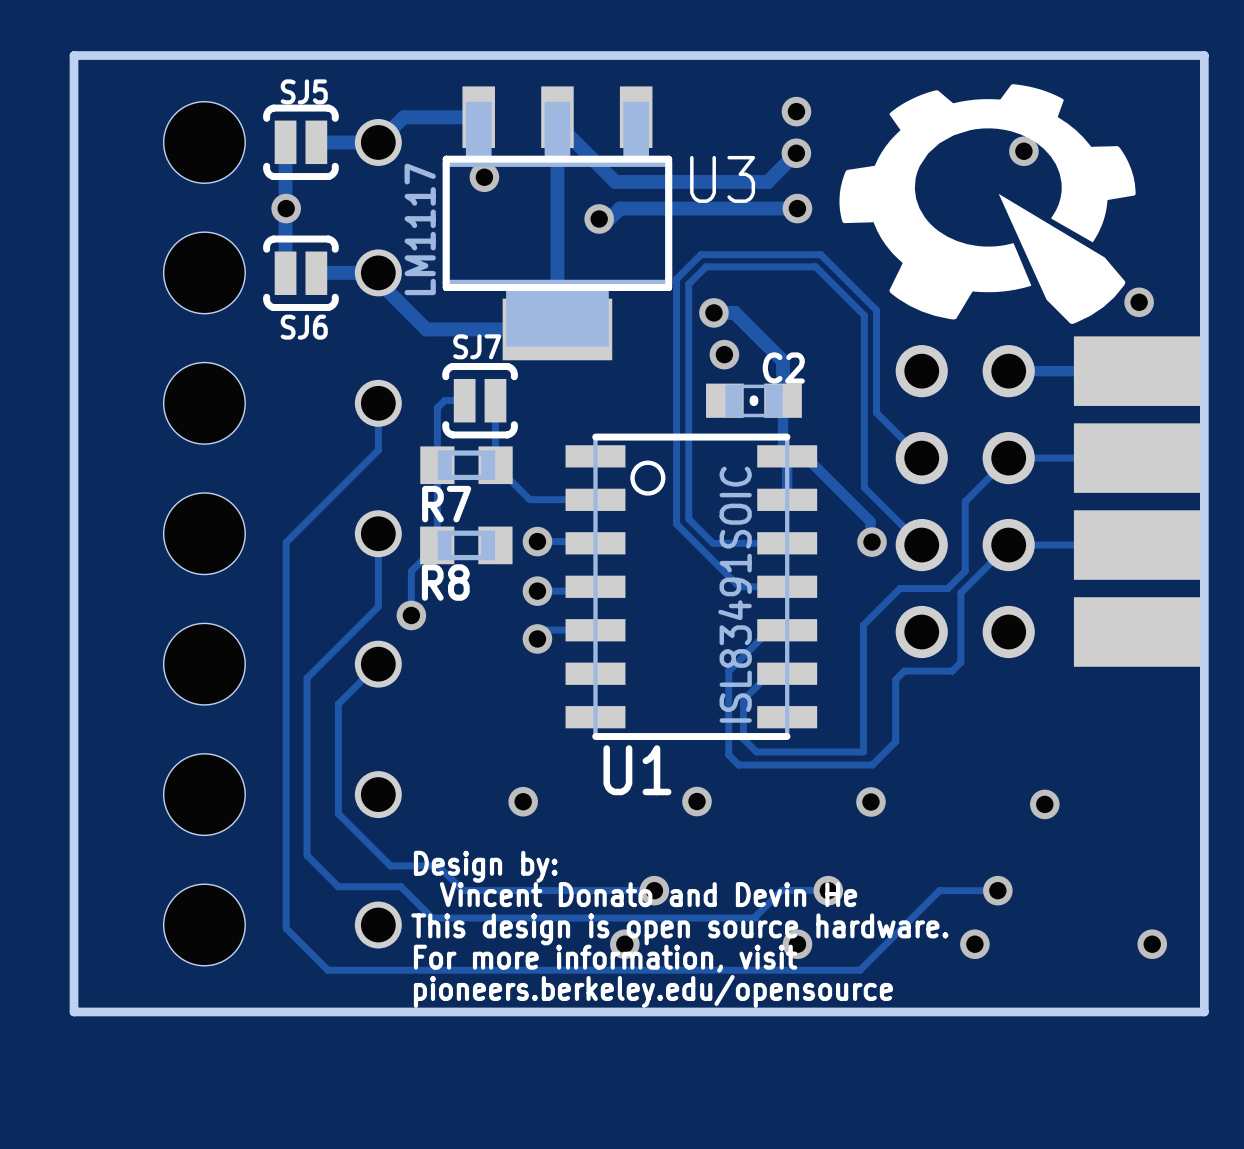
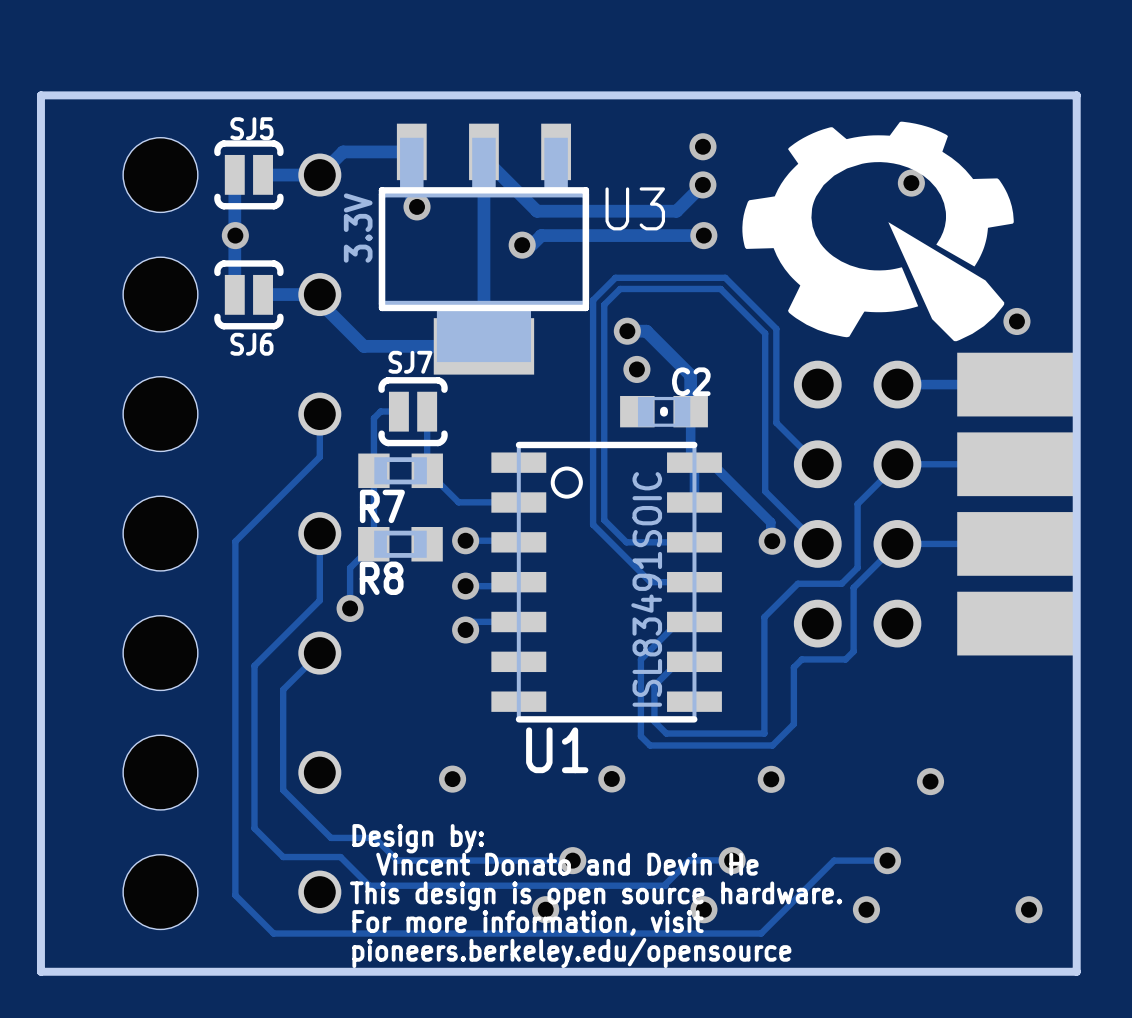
U3 value: LM1117 (420, 229) -> 3.3V (358, 228)

